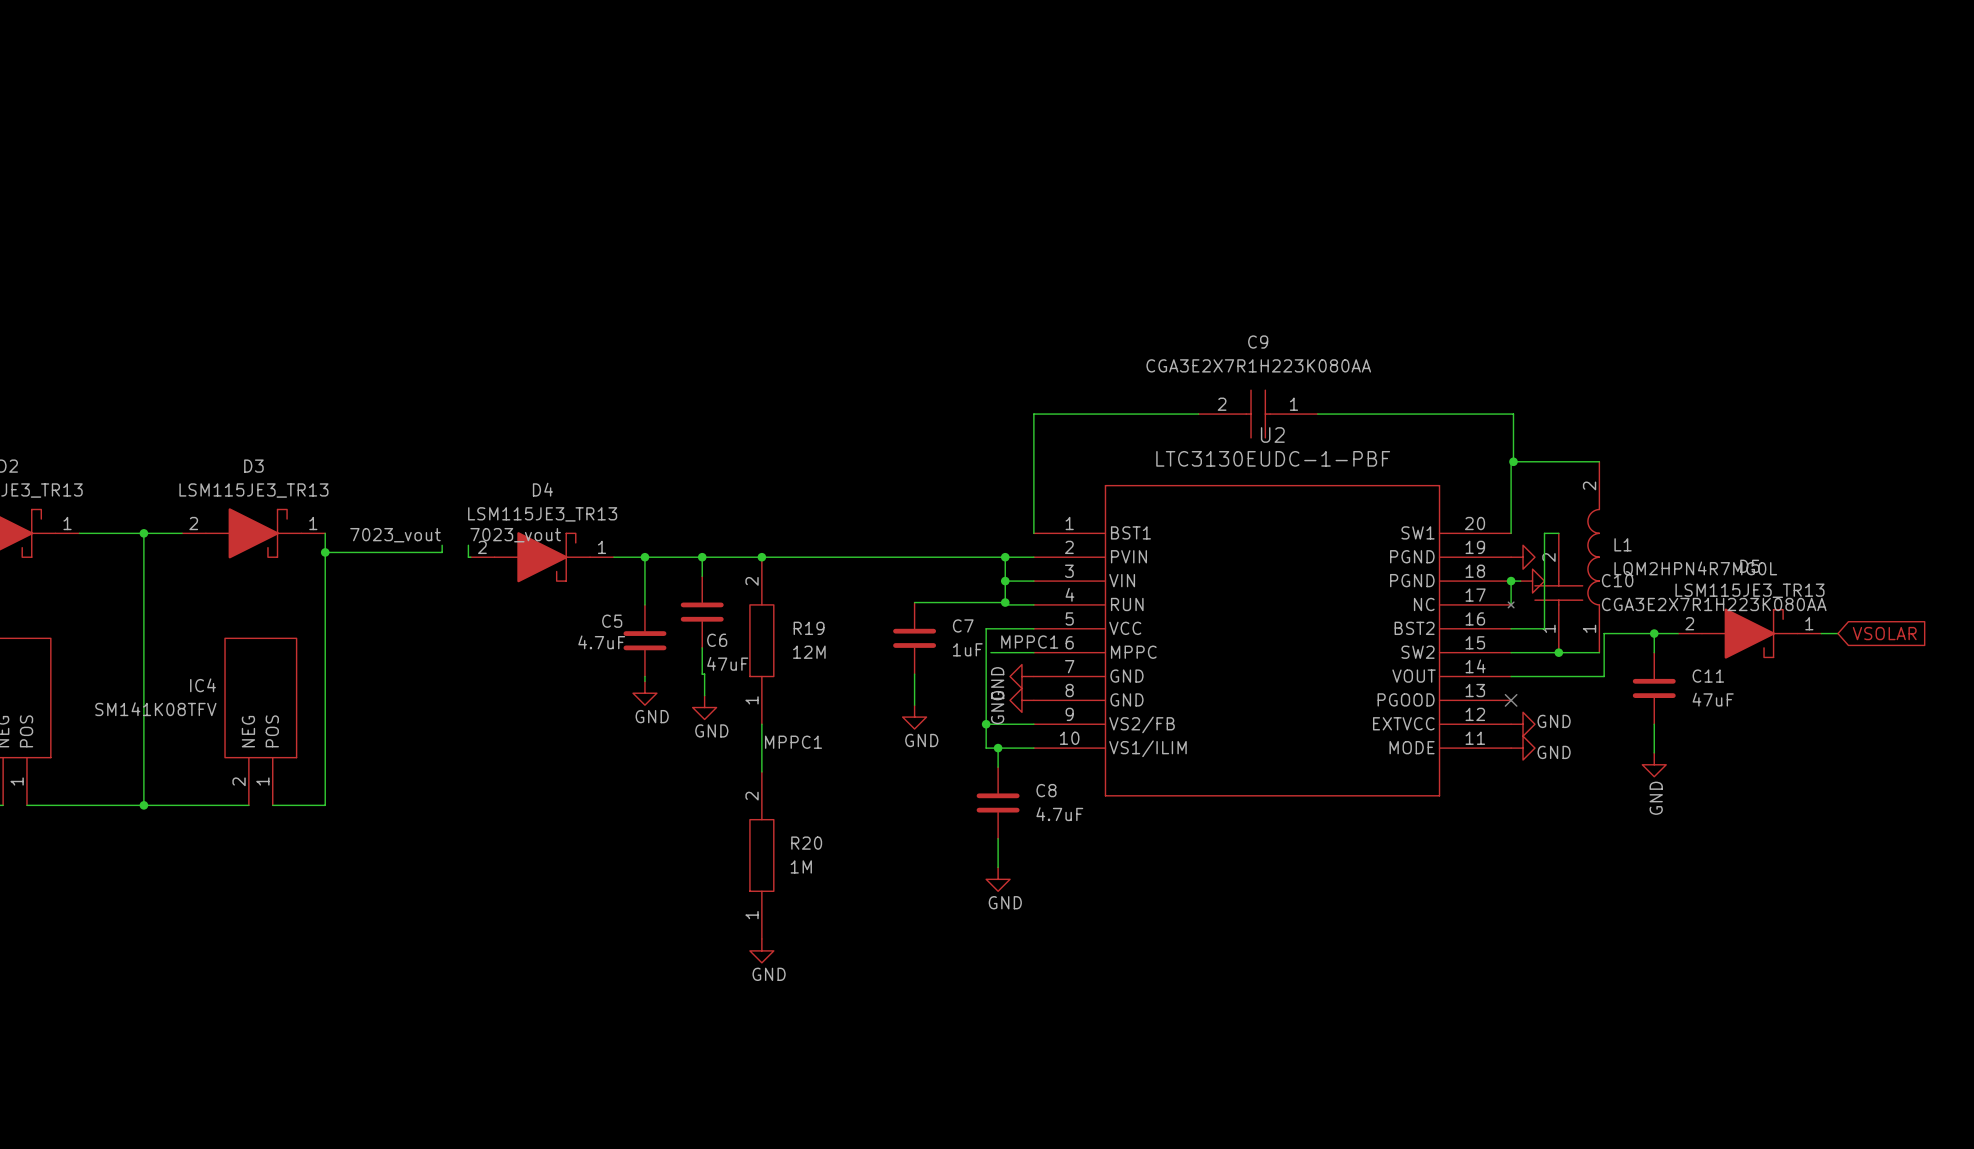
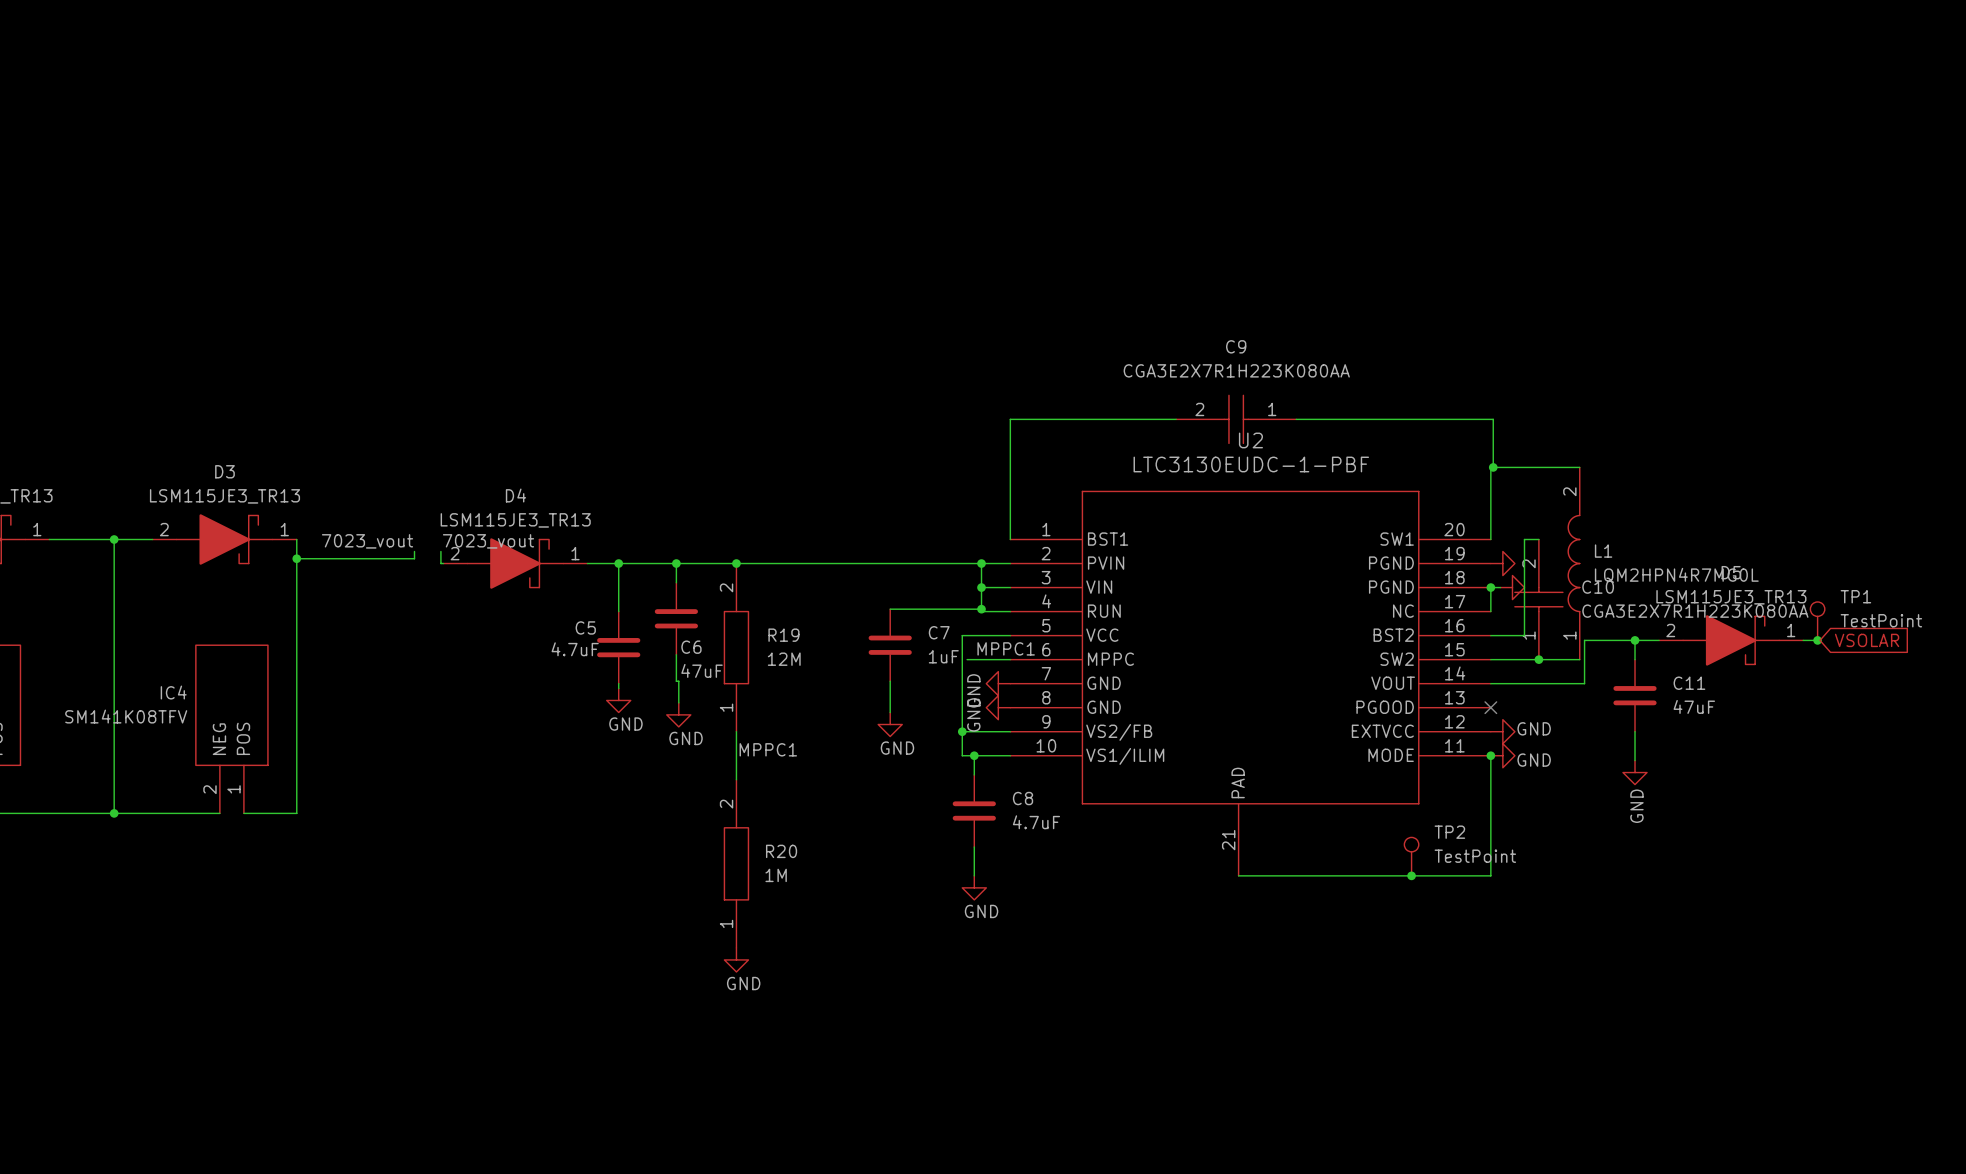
U2 symbol: [1033, 485, 1514, 797] -> [1010, 490, 1491, 876]
TP1: none -> TestPoint (1817, 621)
junction: none -> (1817, 640)
wire: none -> (1490, 755) (1490, 875) (1238, 875)
junction: none -> (1490, 755)
TP2: none -> TestPoint (1411, 856)
junction: none -> (1411, 875)

